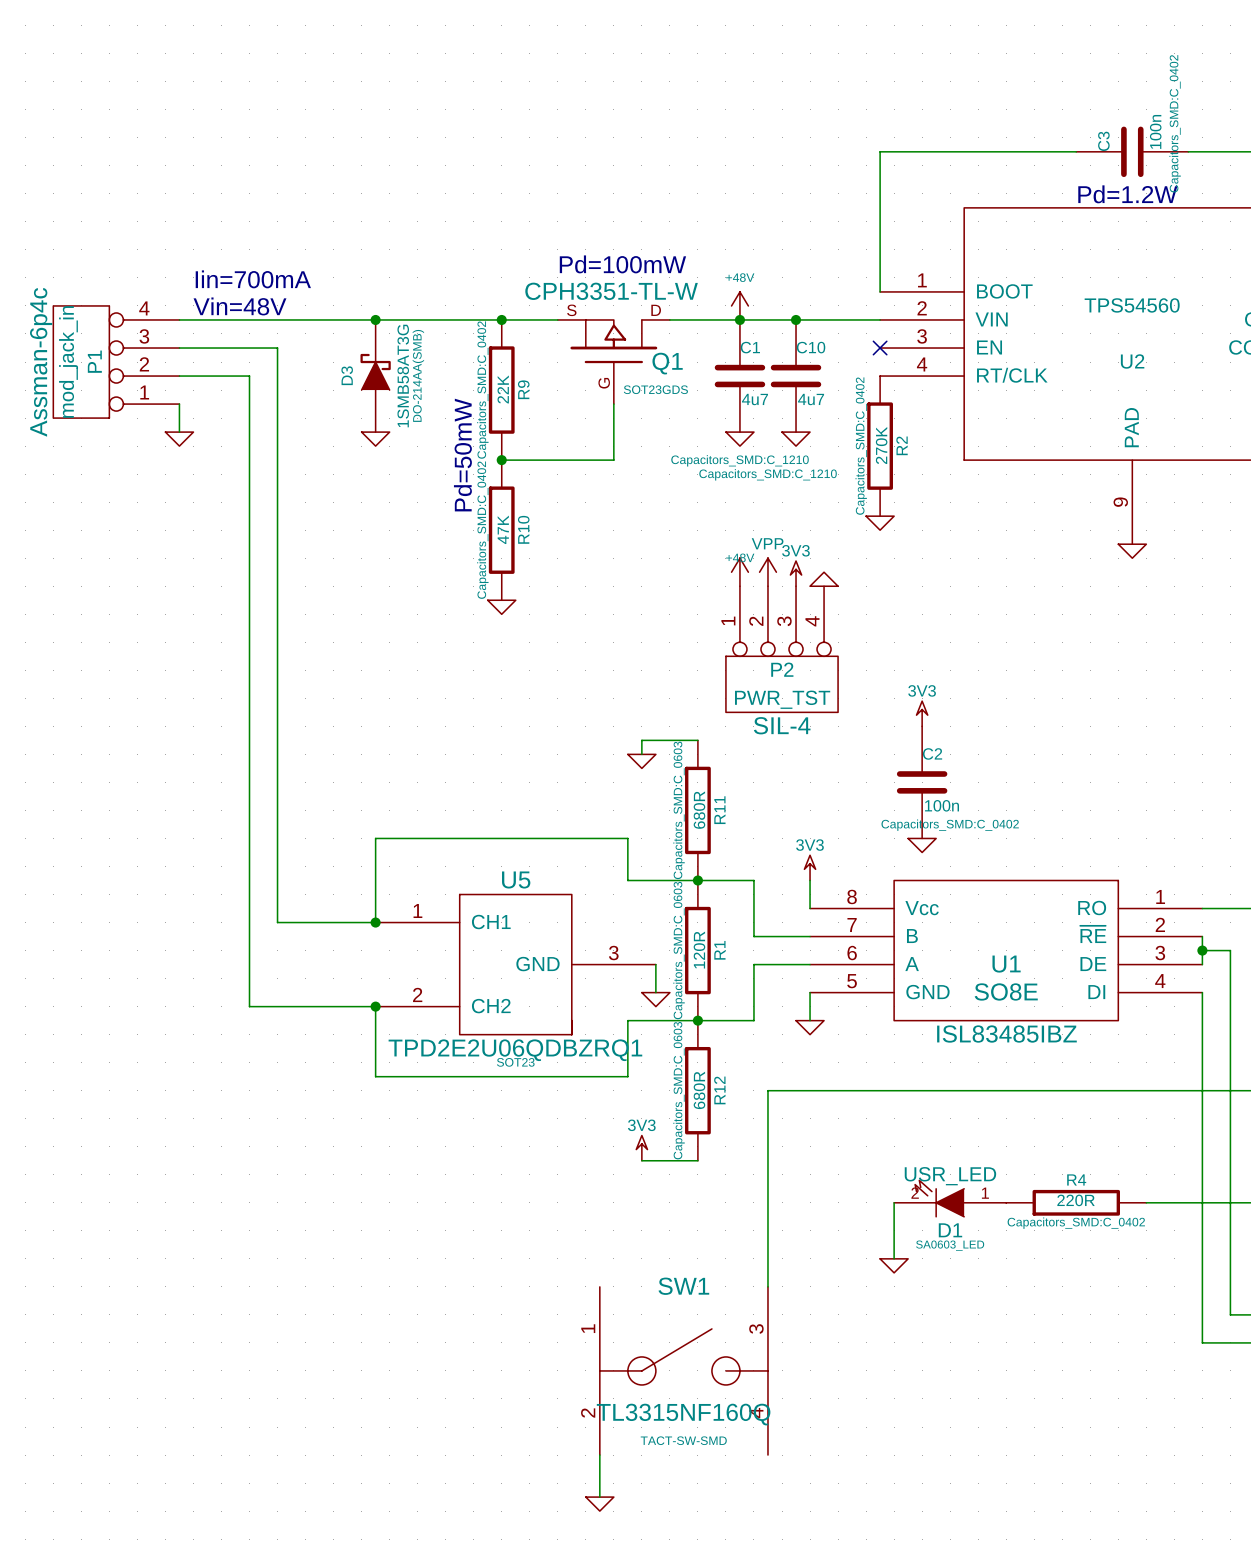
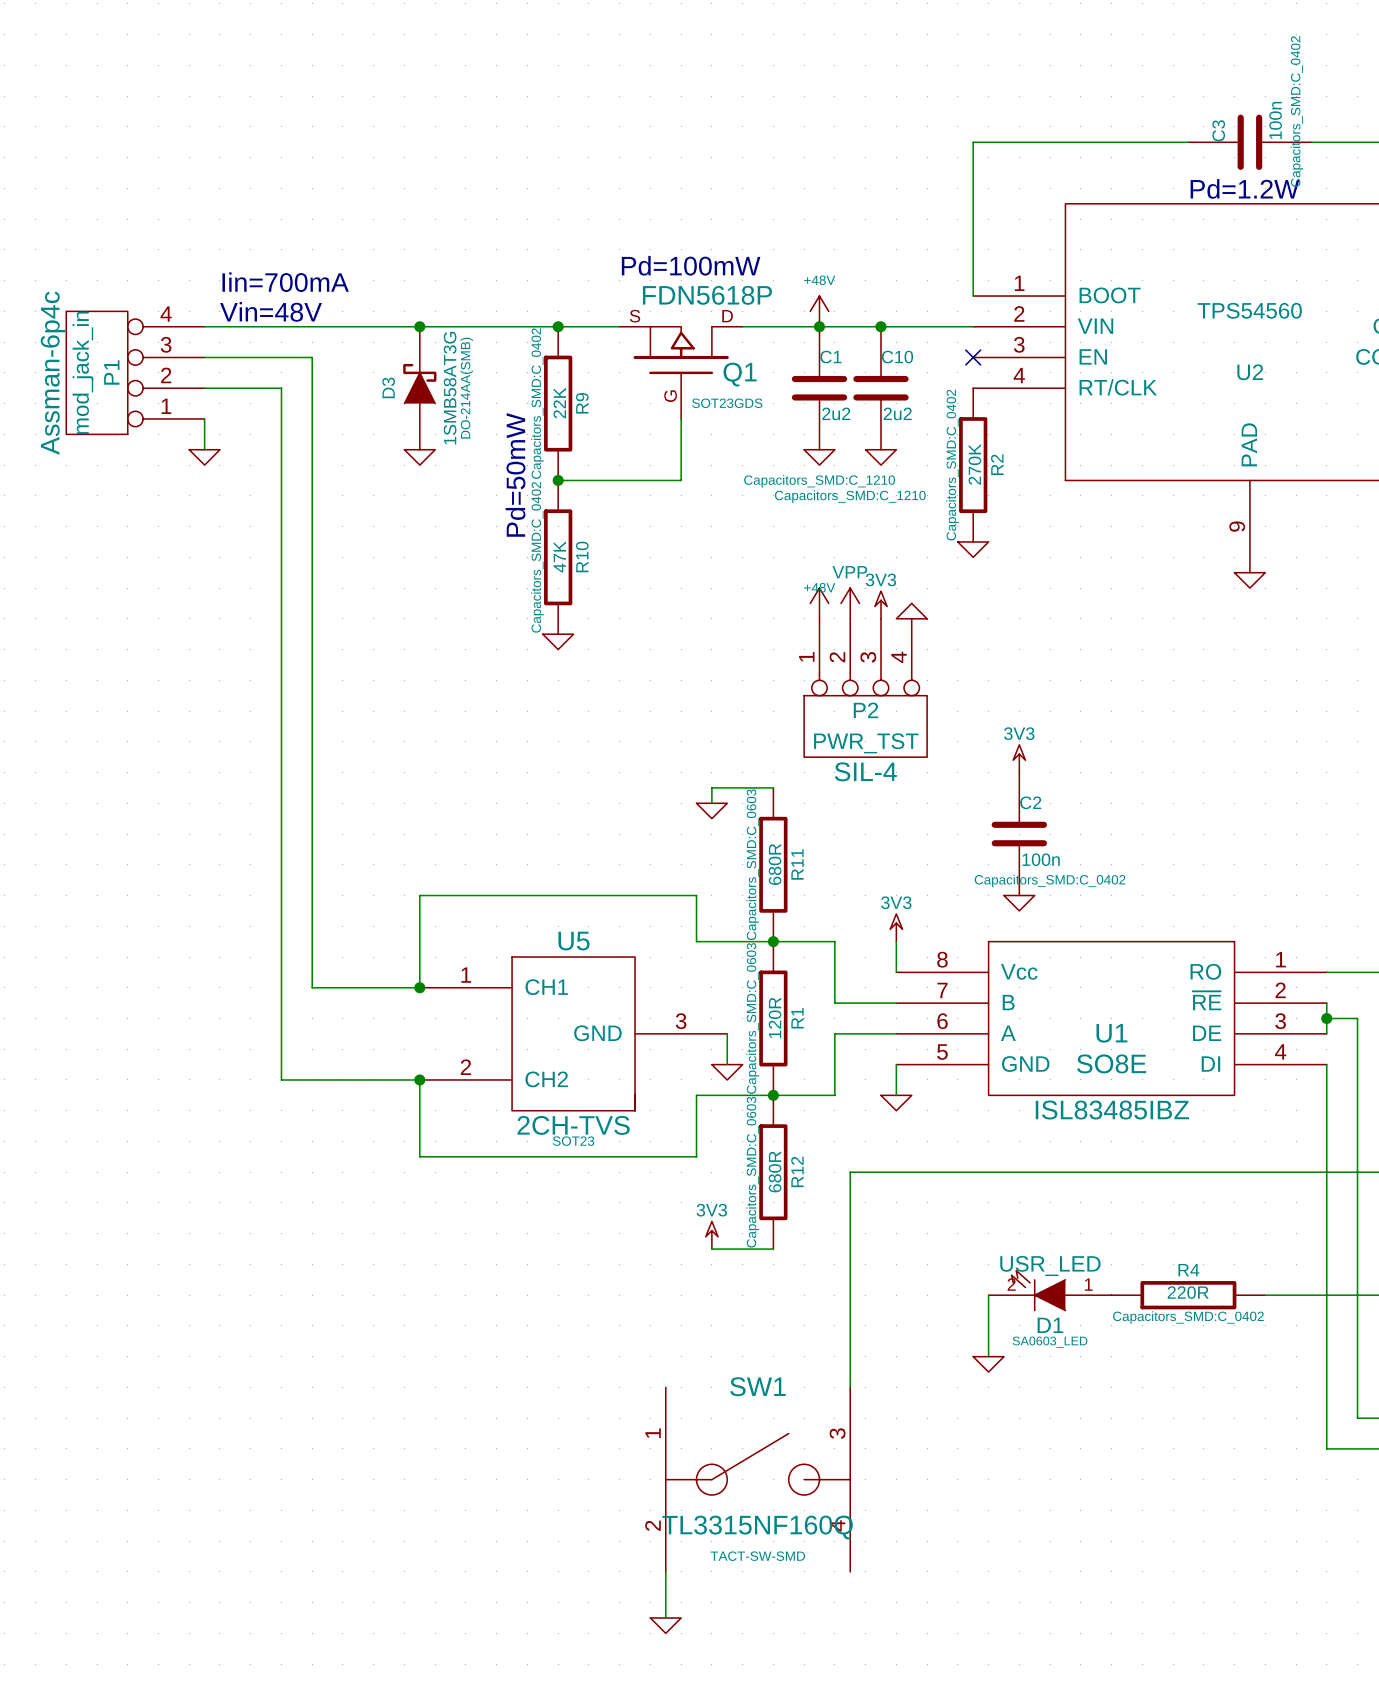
Q1 value: CPH3351-TL-W (611, 291) -> FDN5618P (707, 295)
C1 value: 4u7 (755, 399) -> 2u2 (836, 413)
C10 value: 4u7 (811, 399) -> 2u2 (897, 413)
U5 value: TPD2E2U06QDBZRQ1 (515, 1050) -> 2CH-TVS (573, 1125)

